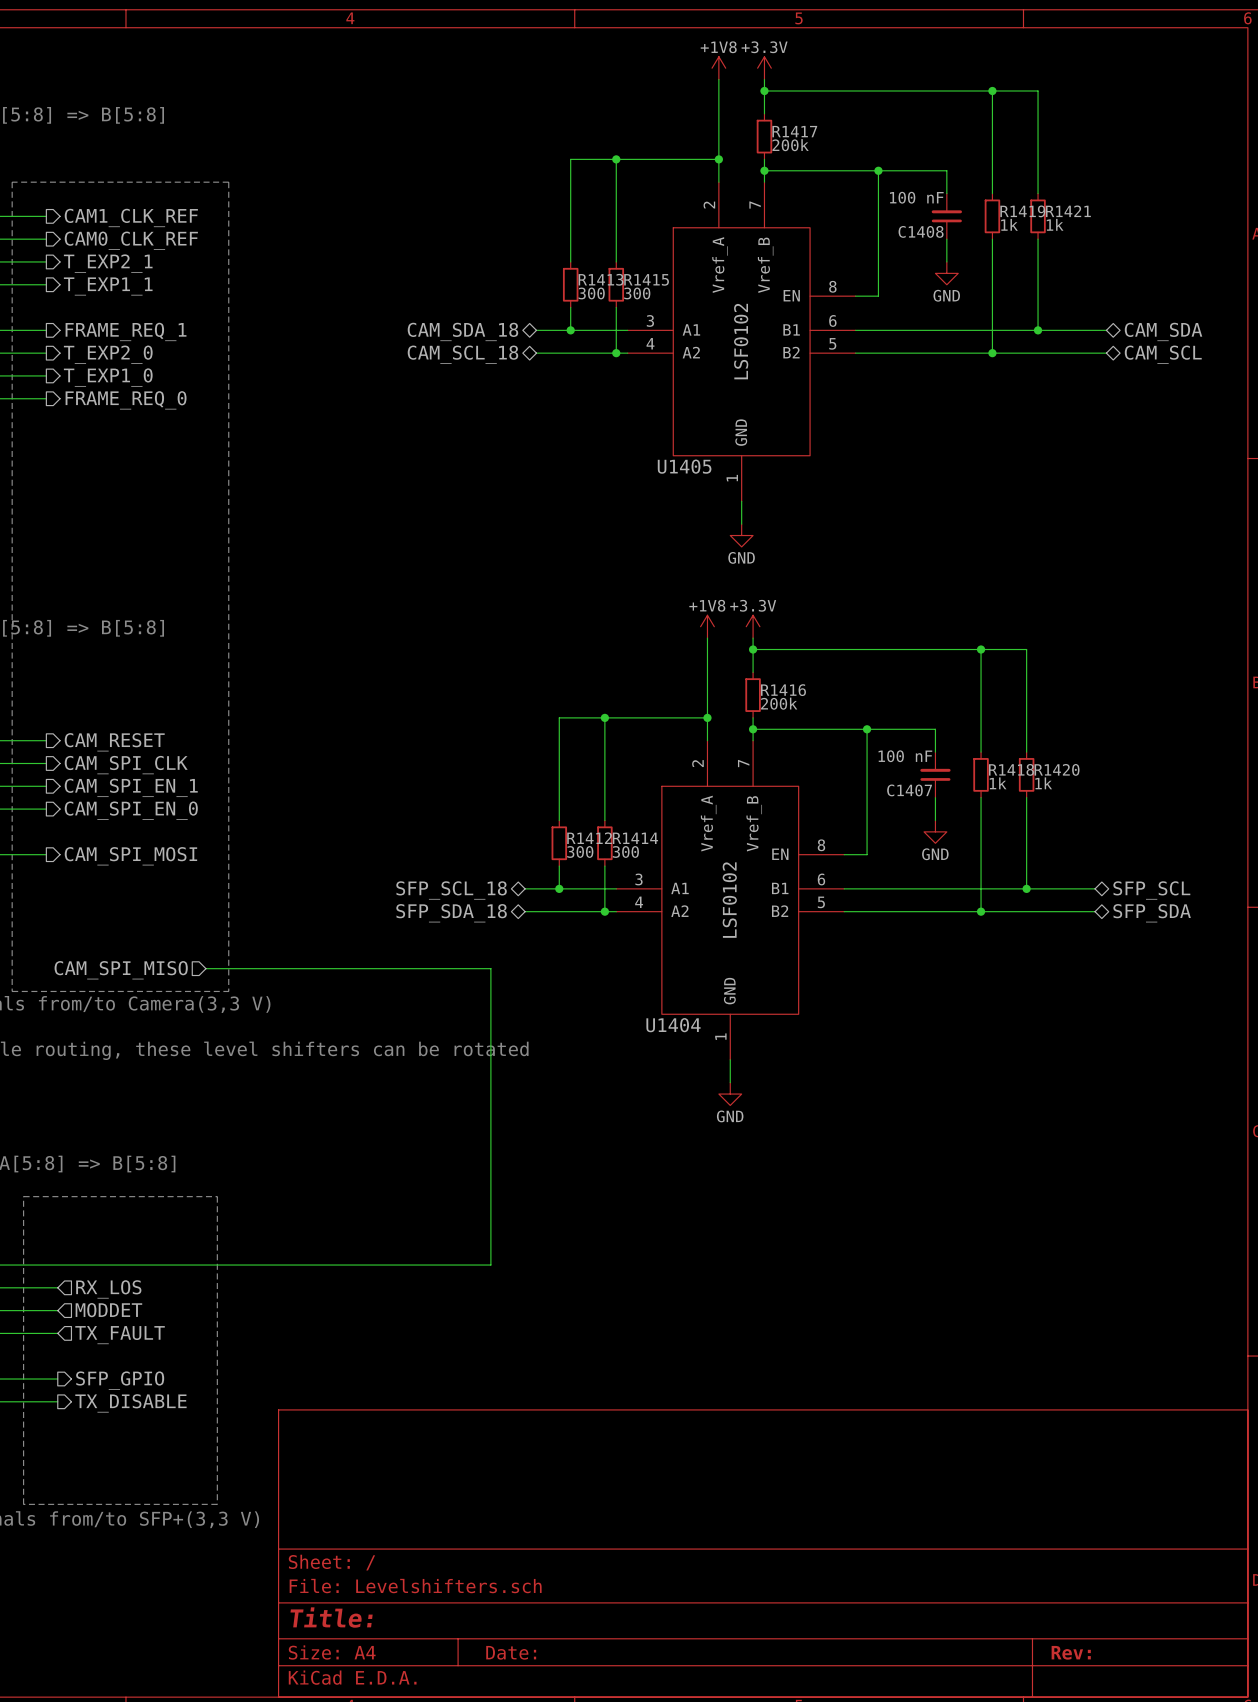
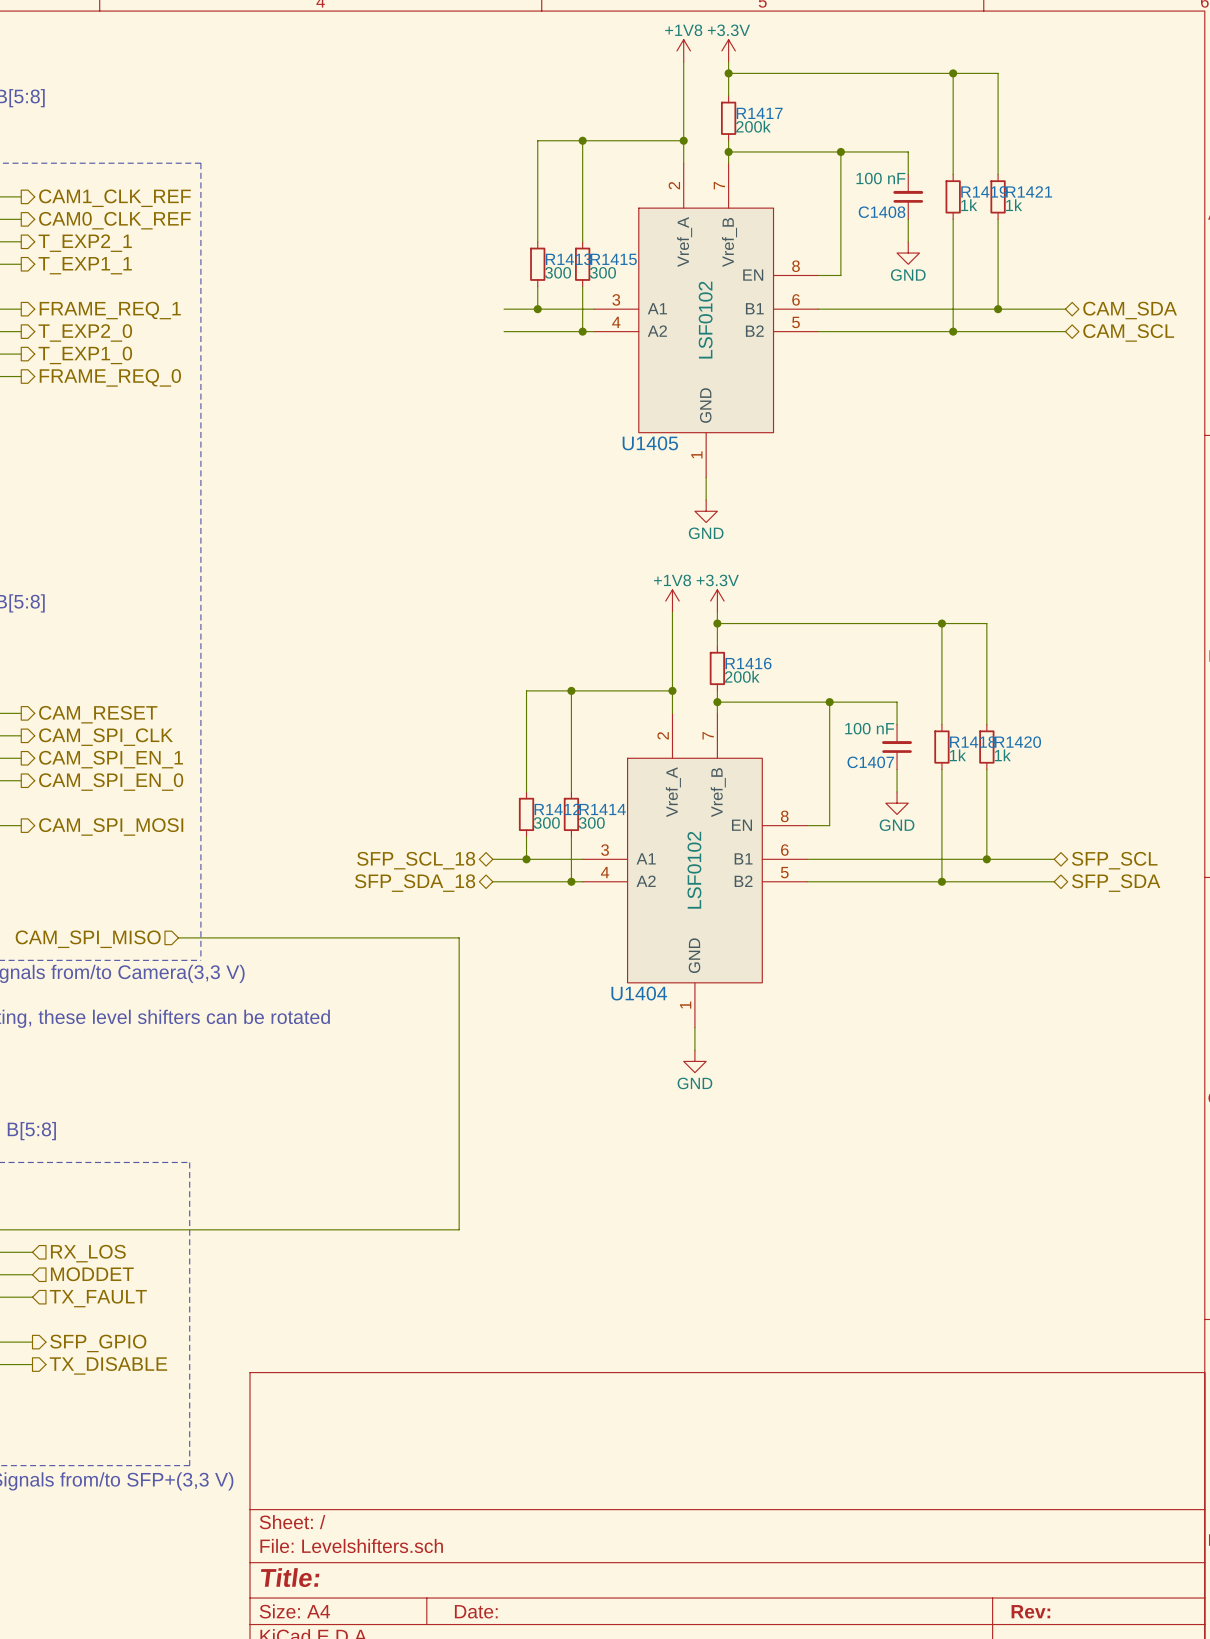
hierarchical label: CAM_SDA_18 (462, 331) -> none
hierarchical label: CAM_SCL_18 (462, 354) -> none

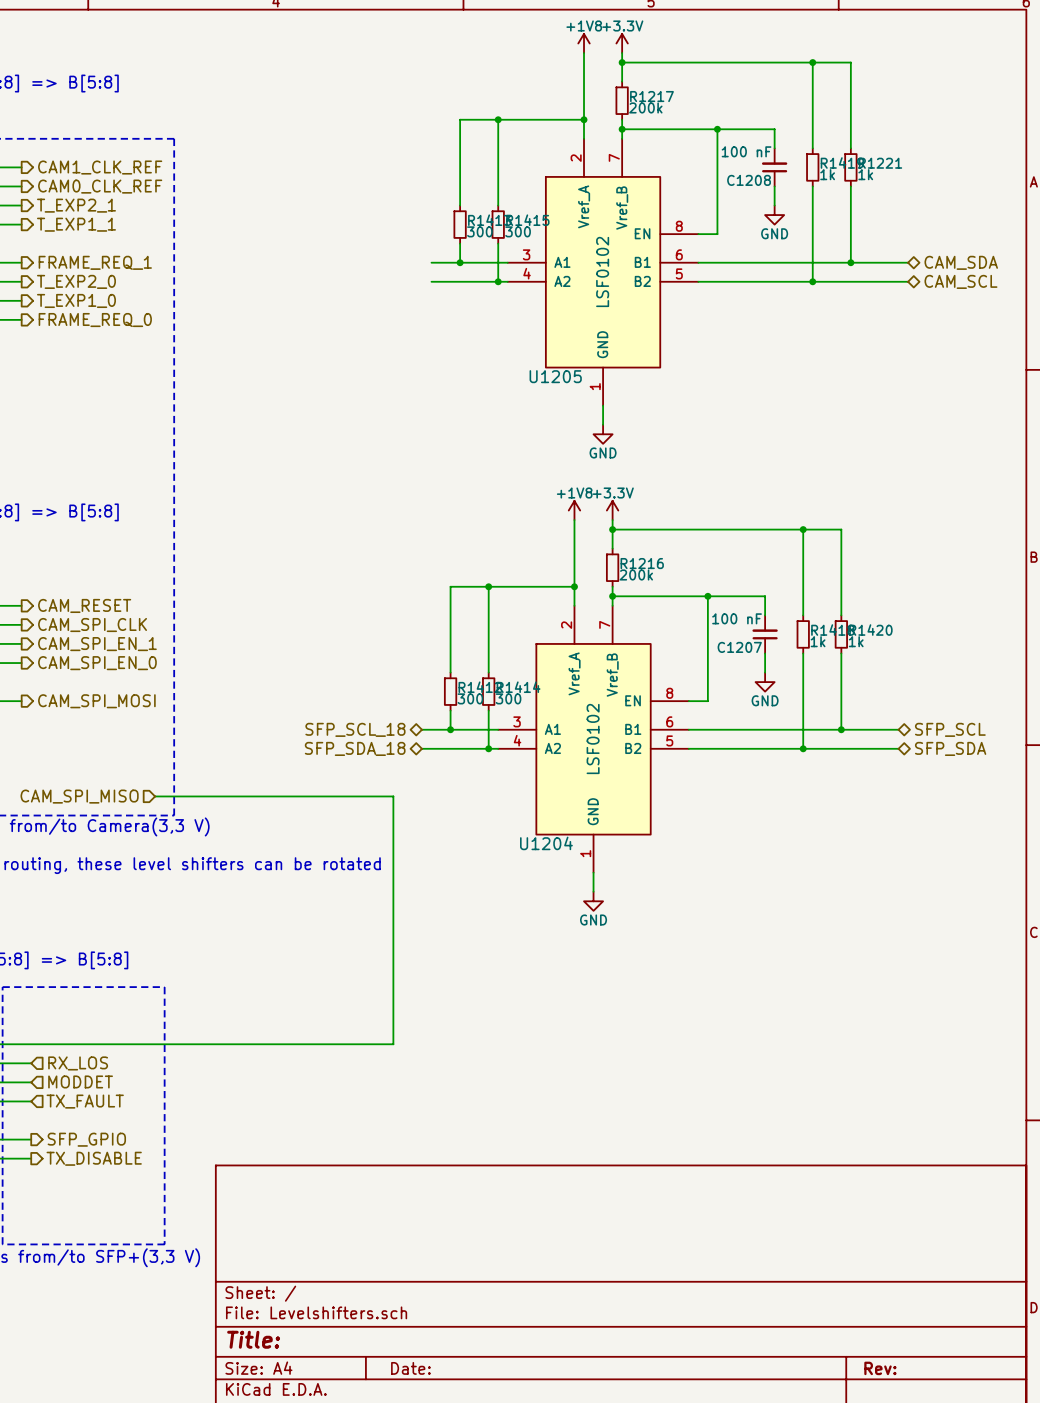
R1417 name: R1417 (759, 113) -> R1217 (651, 96)
R1421 name: R1421 (1029, 191) -> R1221 (880, 163)
C1408 name: C1408 (882, 212) -> C1208 (749, 180)
U1405 name: U1405 (650, 443) -> U1205 (555, 376)
R1416 name: R1416 (748, 663) -> R1216 (642, 563)
C1407 name: C1407 (870, 762) -> C1207 (739, 647)
U1404 name: U1404 (639, 993) -> U1204 (546, 843)

